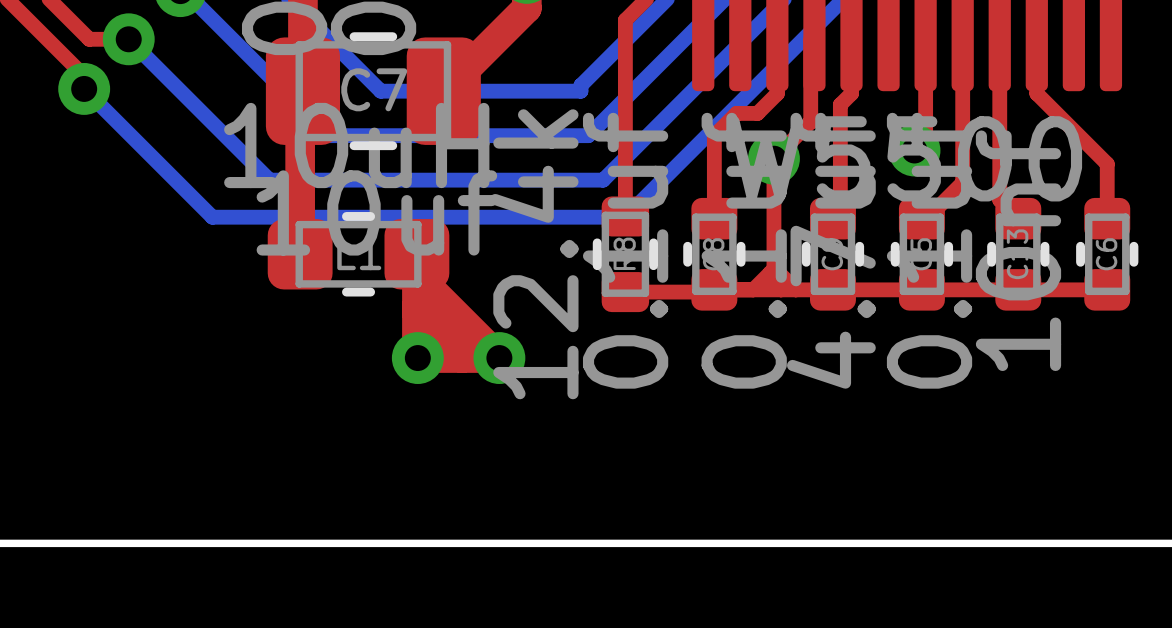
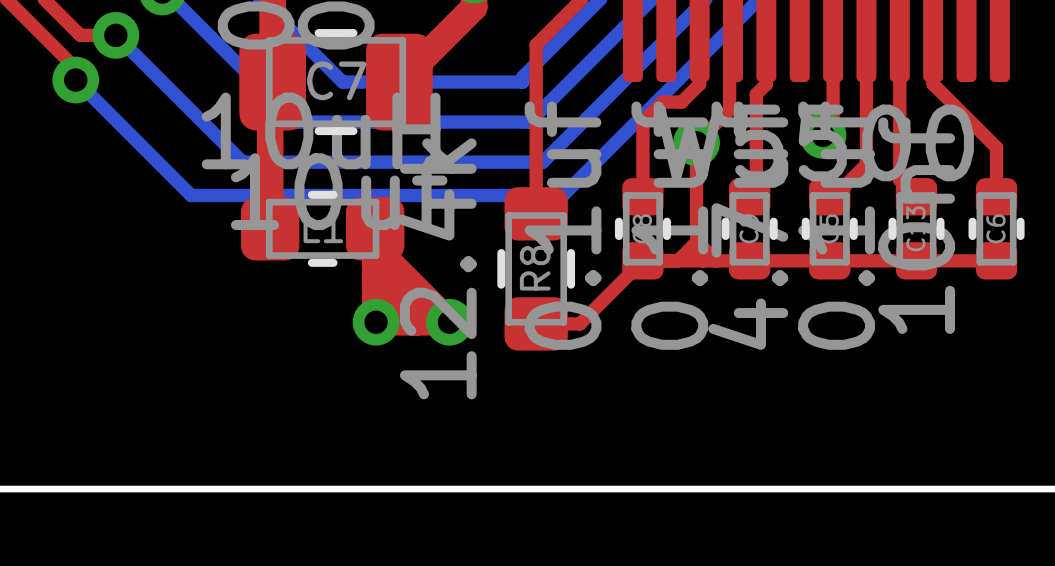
top track: (625, 20) (625, 216) -> (562, 18) (536, 44) (536, 213)
R8 footprint: [592, 196, 659, 313] -> [497, 187, 576, 351]
top track: (625, 292) (712, 292) -> (536, 323) (579, 323) (640, 262)

